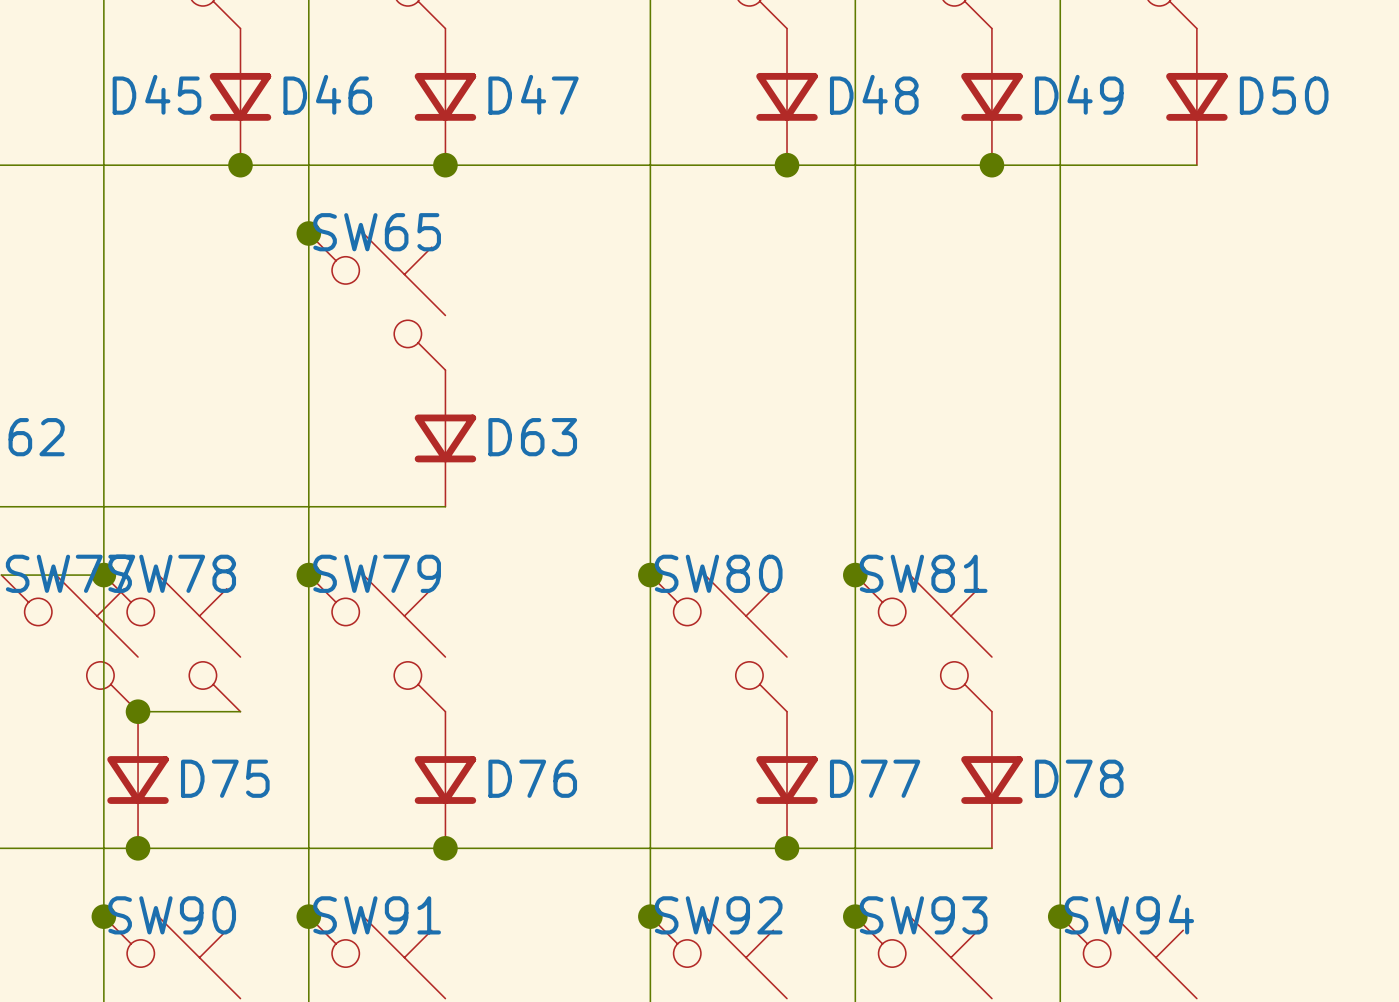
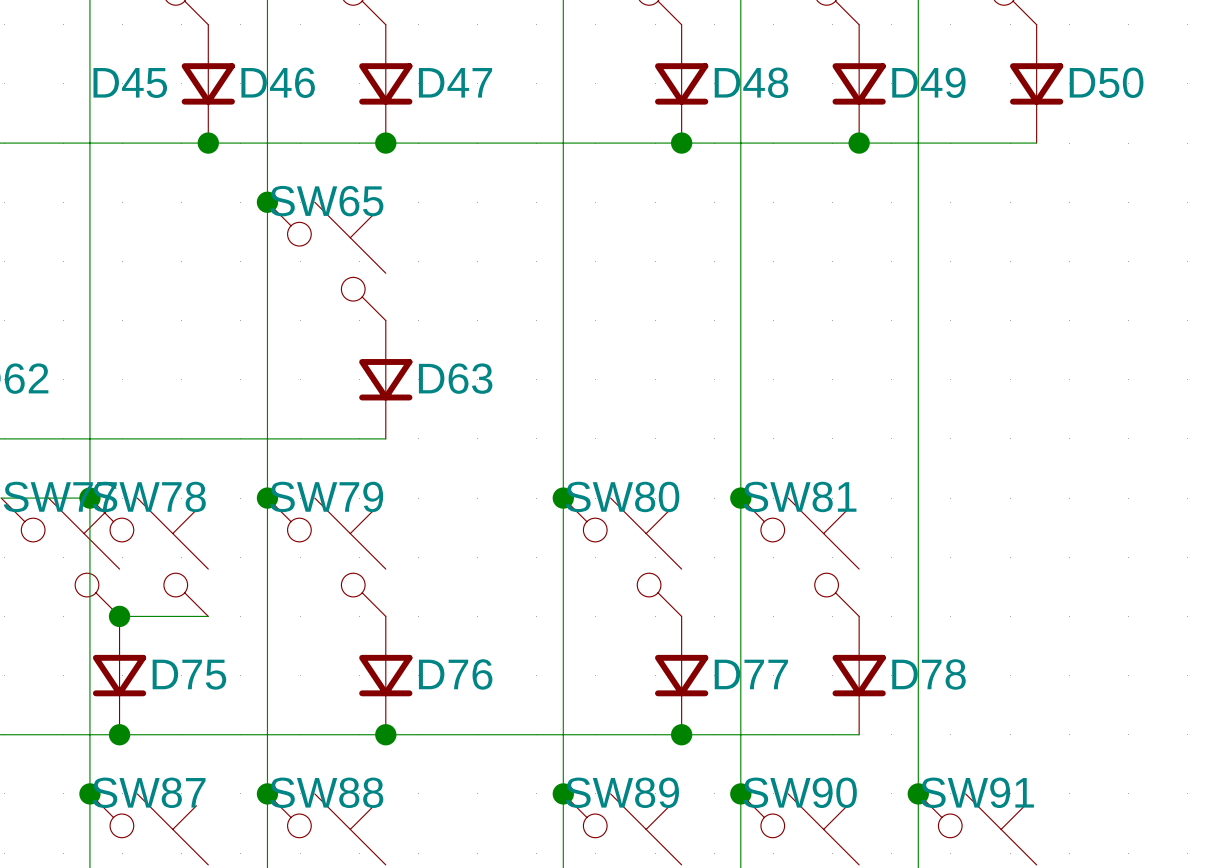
SW94 name: SW94 (1129, 914) -> SW91 (977, 792)
SW90 name: SW90 (172, 915) -> SW87 (149, 792)
SW91 name: SW91 (377, 915) -> SW88 (326, 792)
SW92 name: SW92 (718, 915) -> SW89 (622, 792)
SW93 name: SW93 (923, 915) -> SW90 (800, 792)

